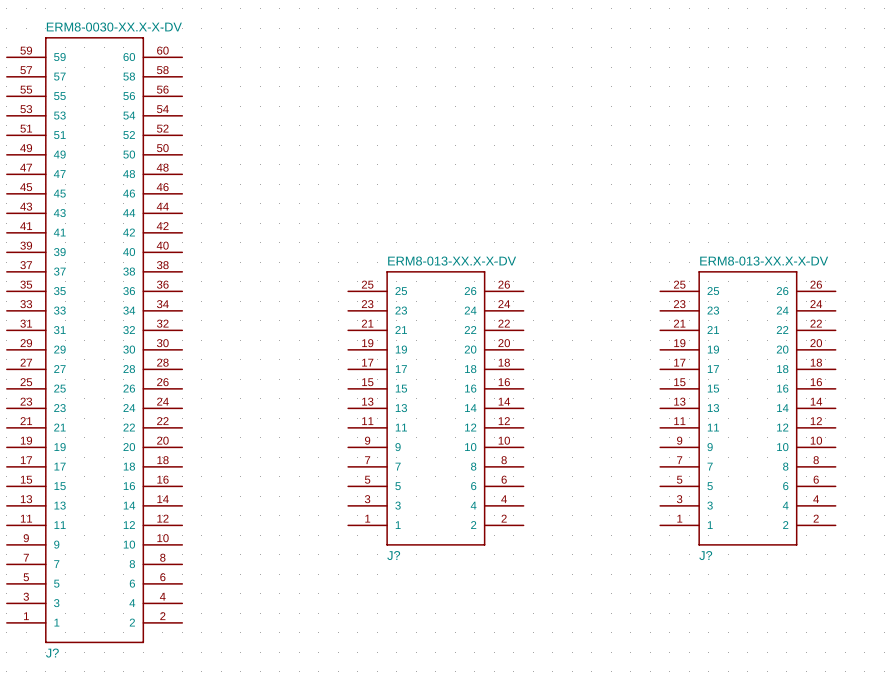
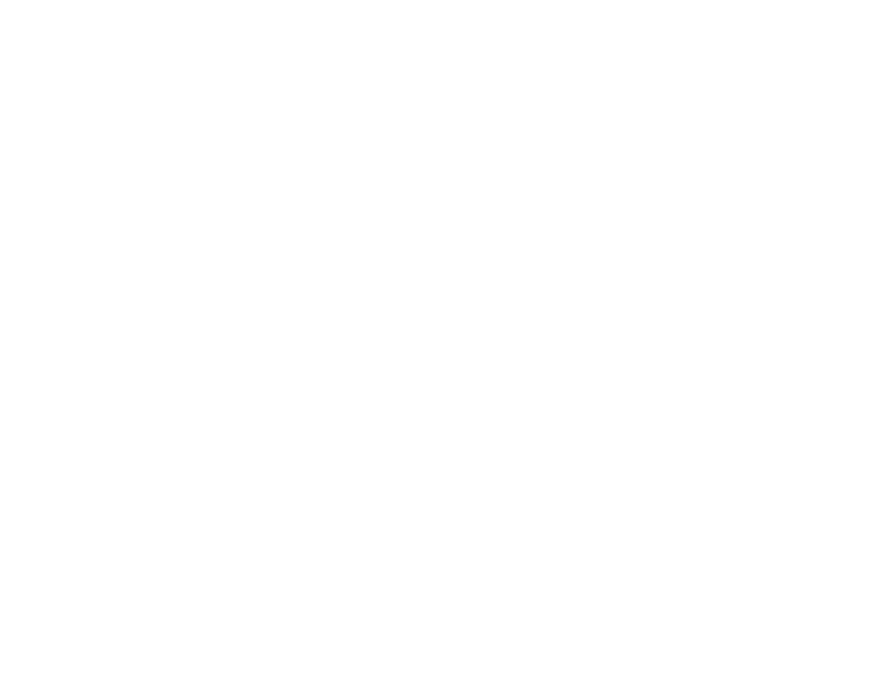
J?: ERM8-0030-XX.X-X-DV (94, 340) -> none
J?: ERM8-013-XX.X-X-DV (435, 408) -> none
J?: ERM8-013-XX.X-X-DV (747, 408) -> none

